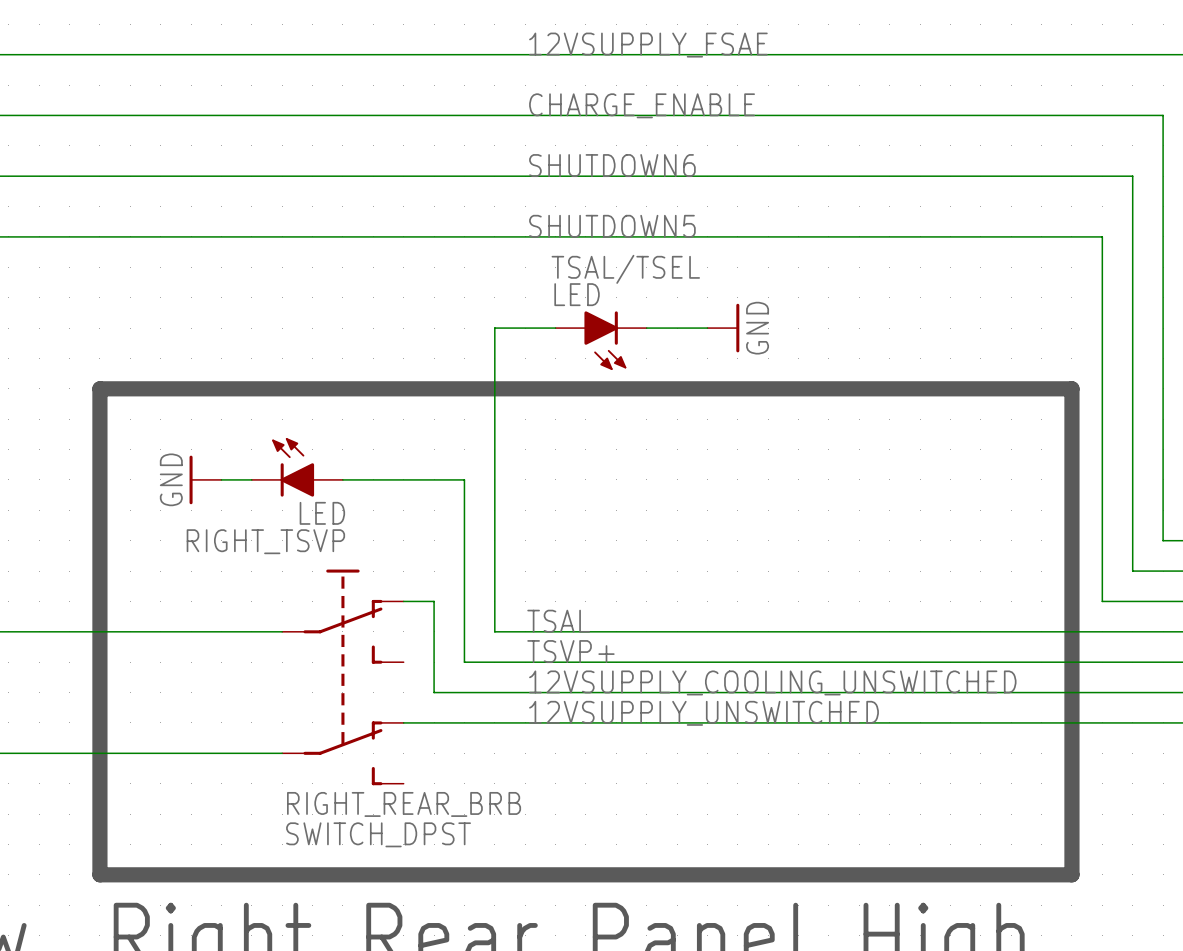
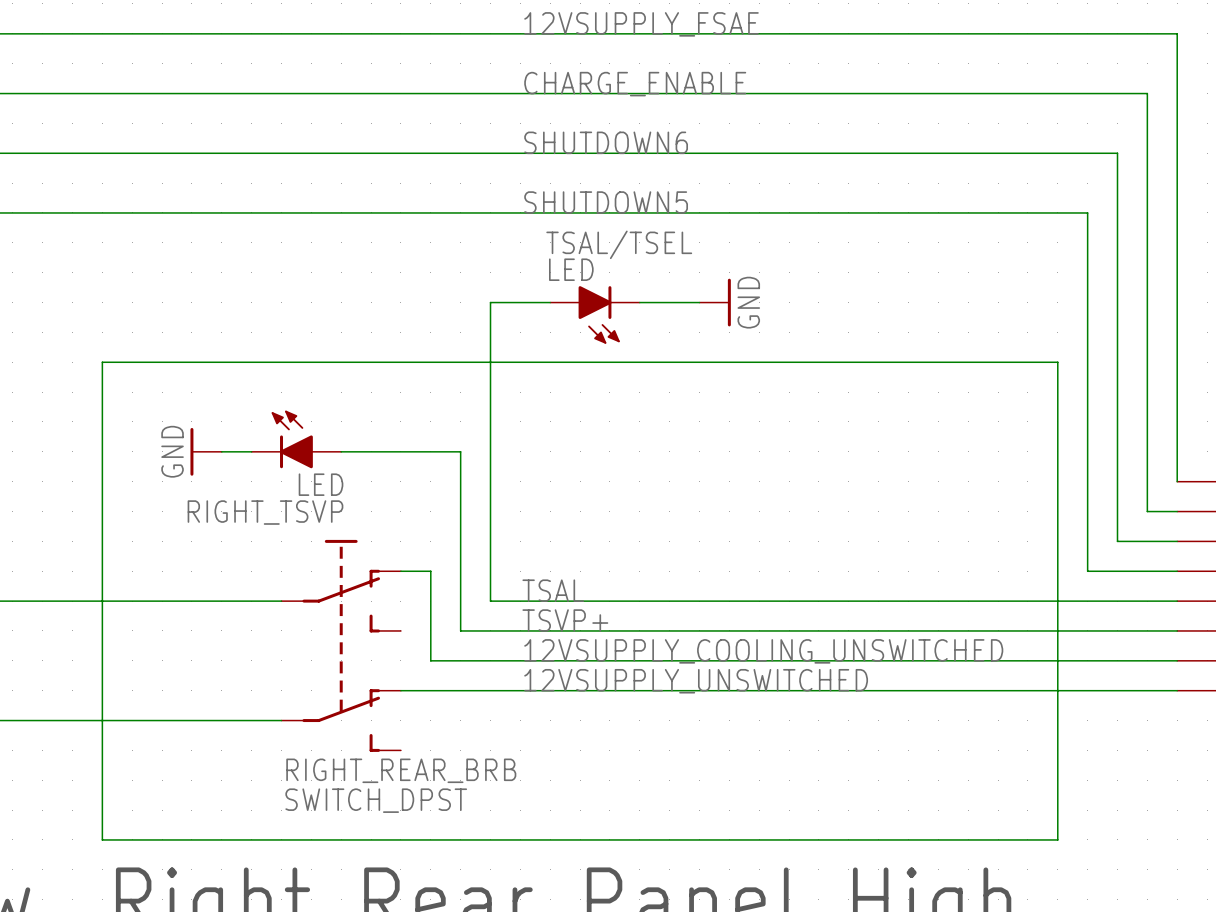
line: (99, 388) (1071, 388) (1071, 874) (99, 874) (99, 388) -> none

